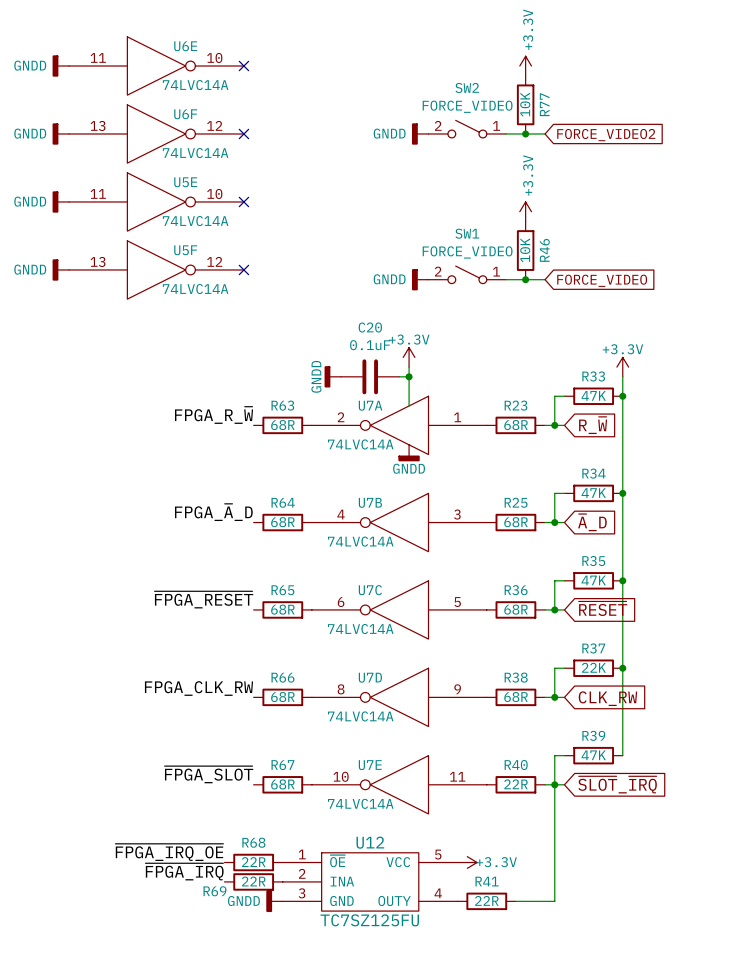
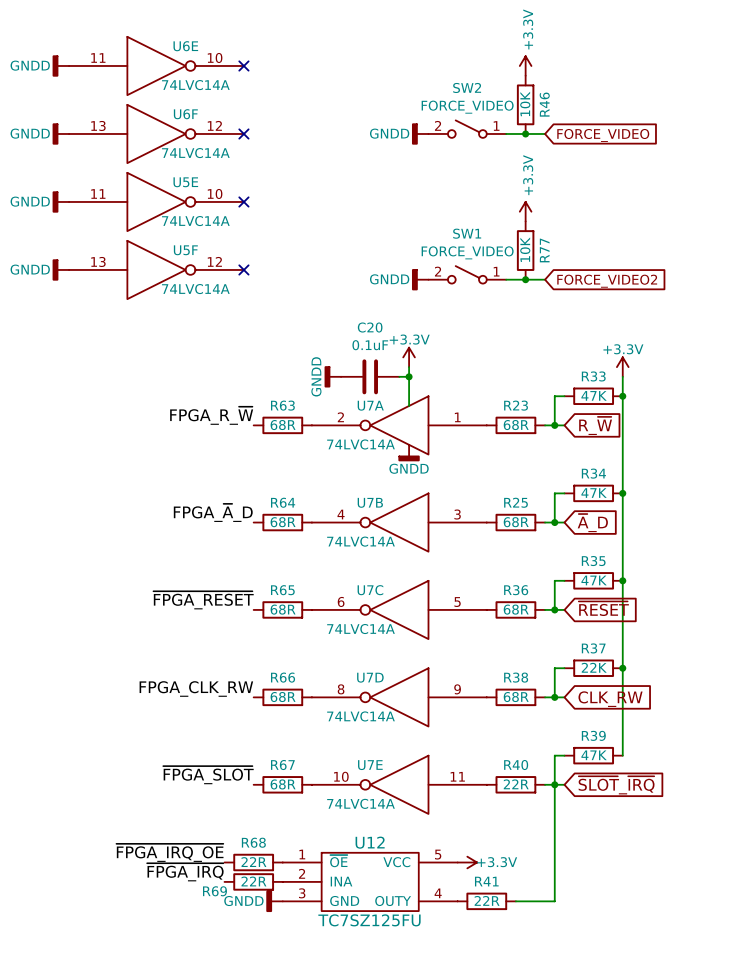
R77 name: R77 (544, 104) -> R46 (544, 104)
global label: FORCE_VIDEO2 (606, 135) -> FORCE_VIDEO (603, 135)
R46 name: R46 (544, 250) -> R77 (544, 250)
global label: FORCE_VIDEO (602, 280) -> FORCE_VIDEO2 (607, 281)

